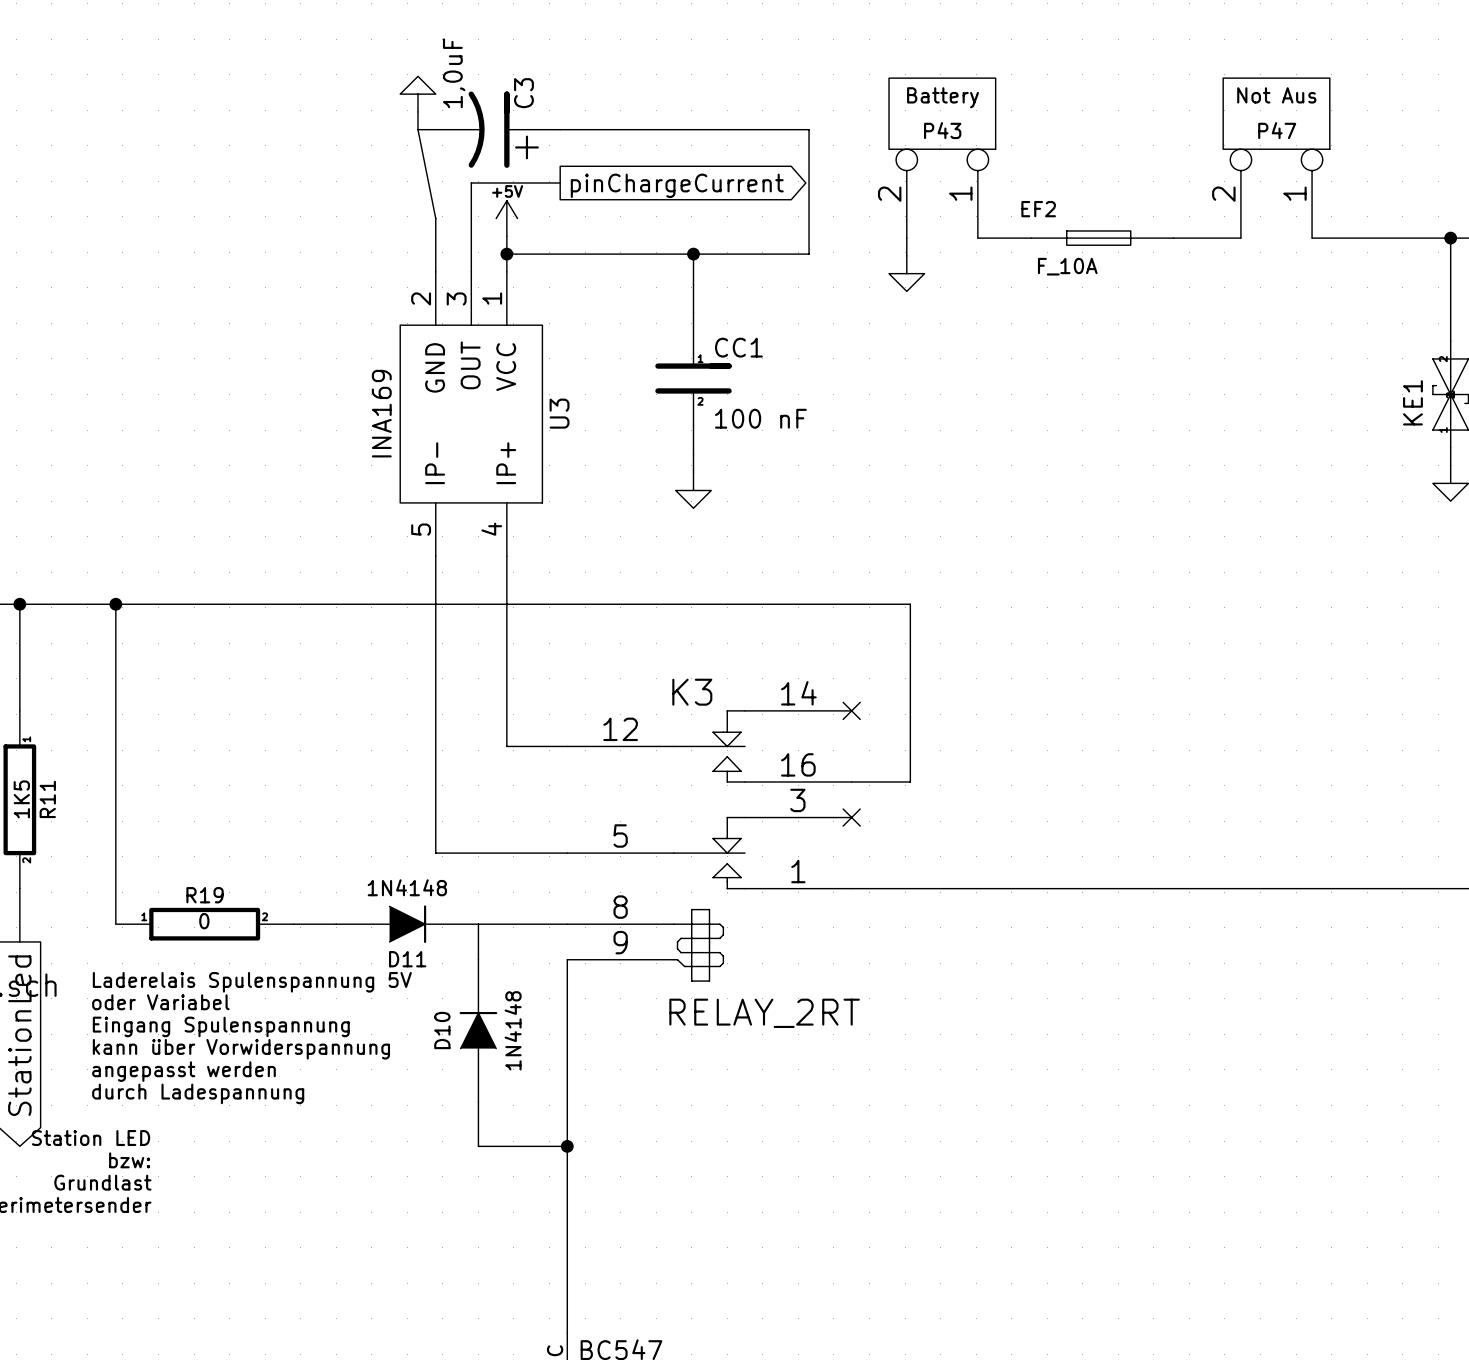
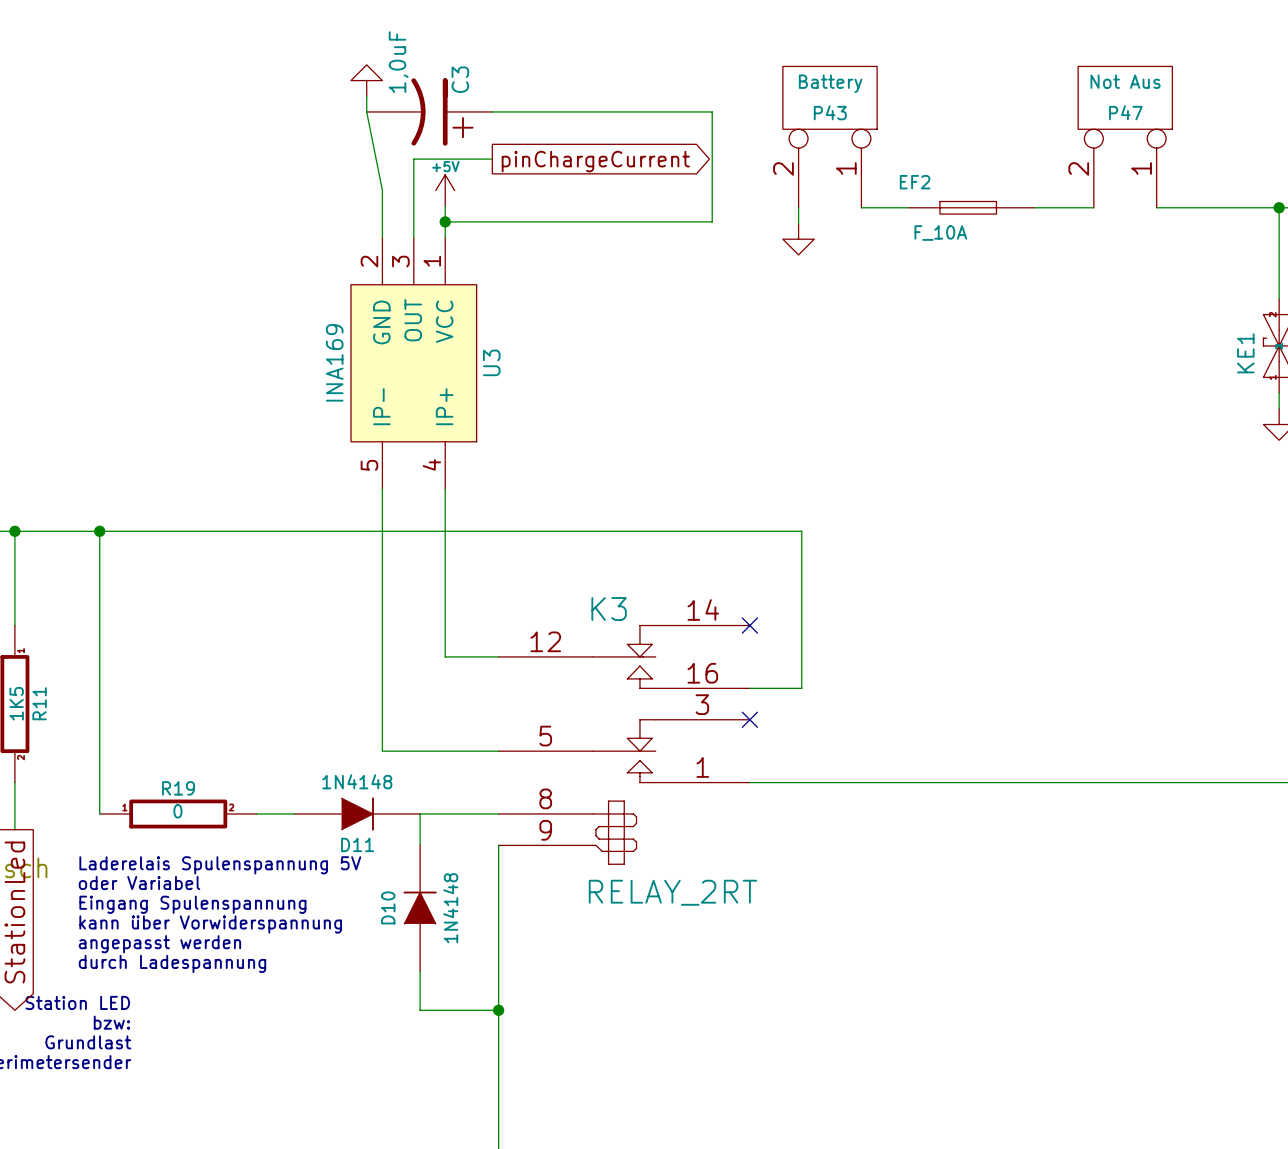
wire: (693, 254) (693, 312) -> none
junction: (693, 254) -> none
CC1: 100 nF (693, 383) -> none
wire: (693, 454) (693, 472) -> none
power symbol: (693, 490) -> none

